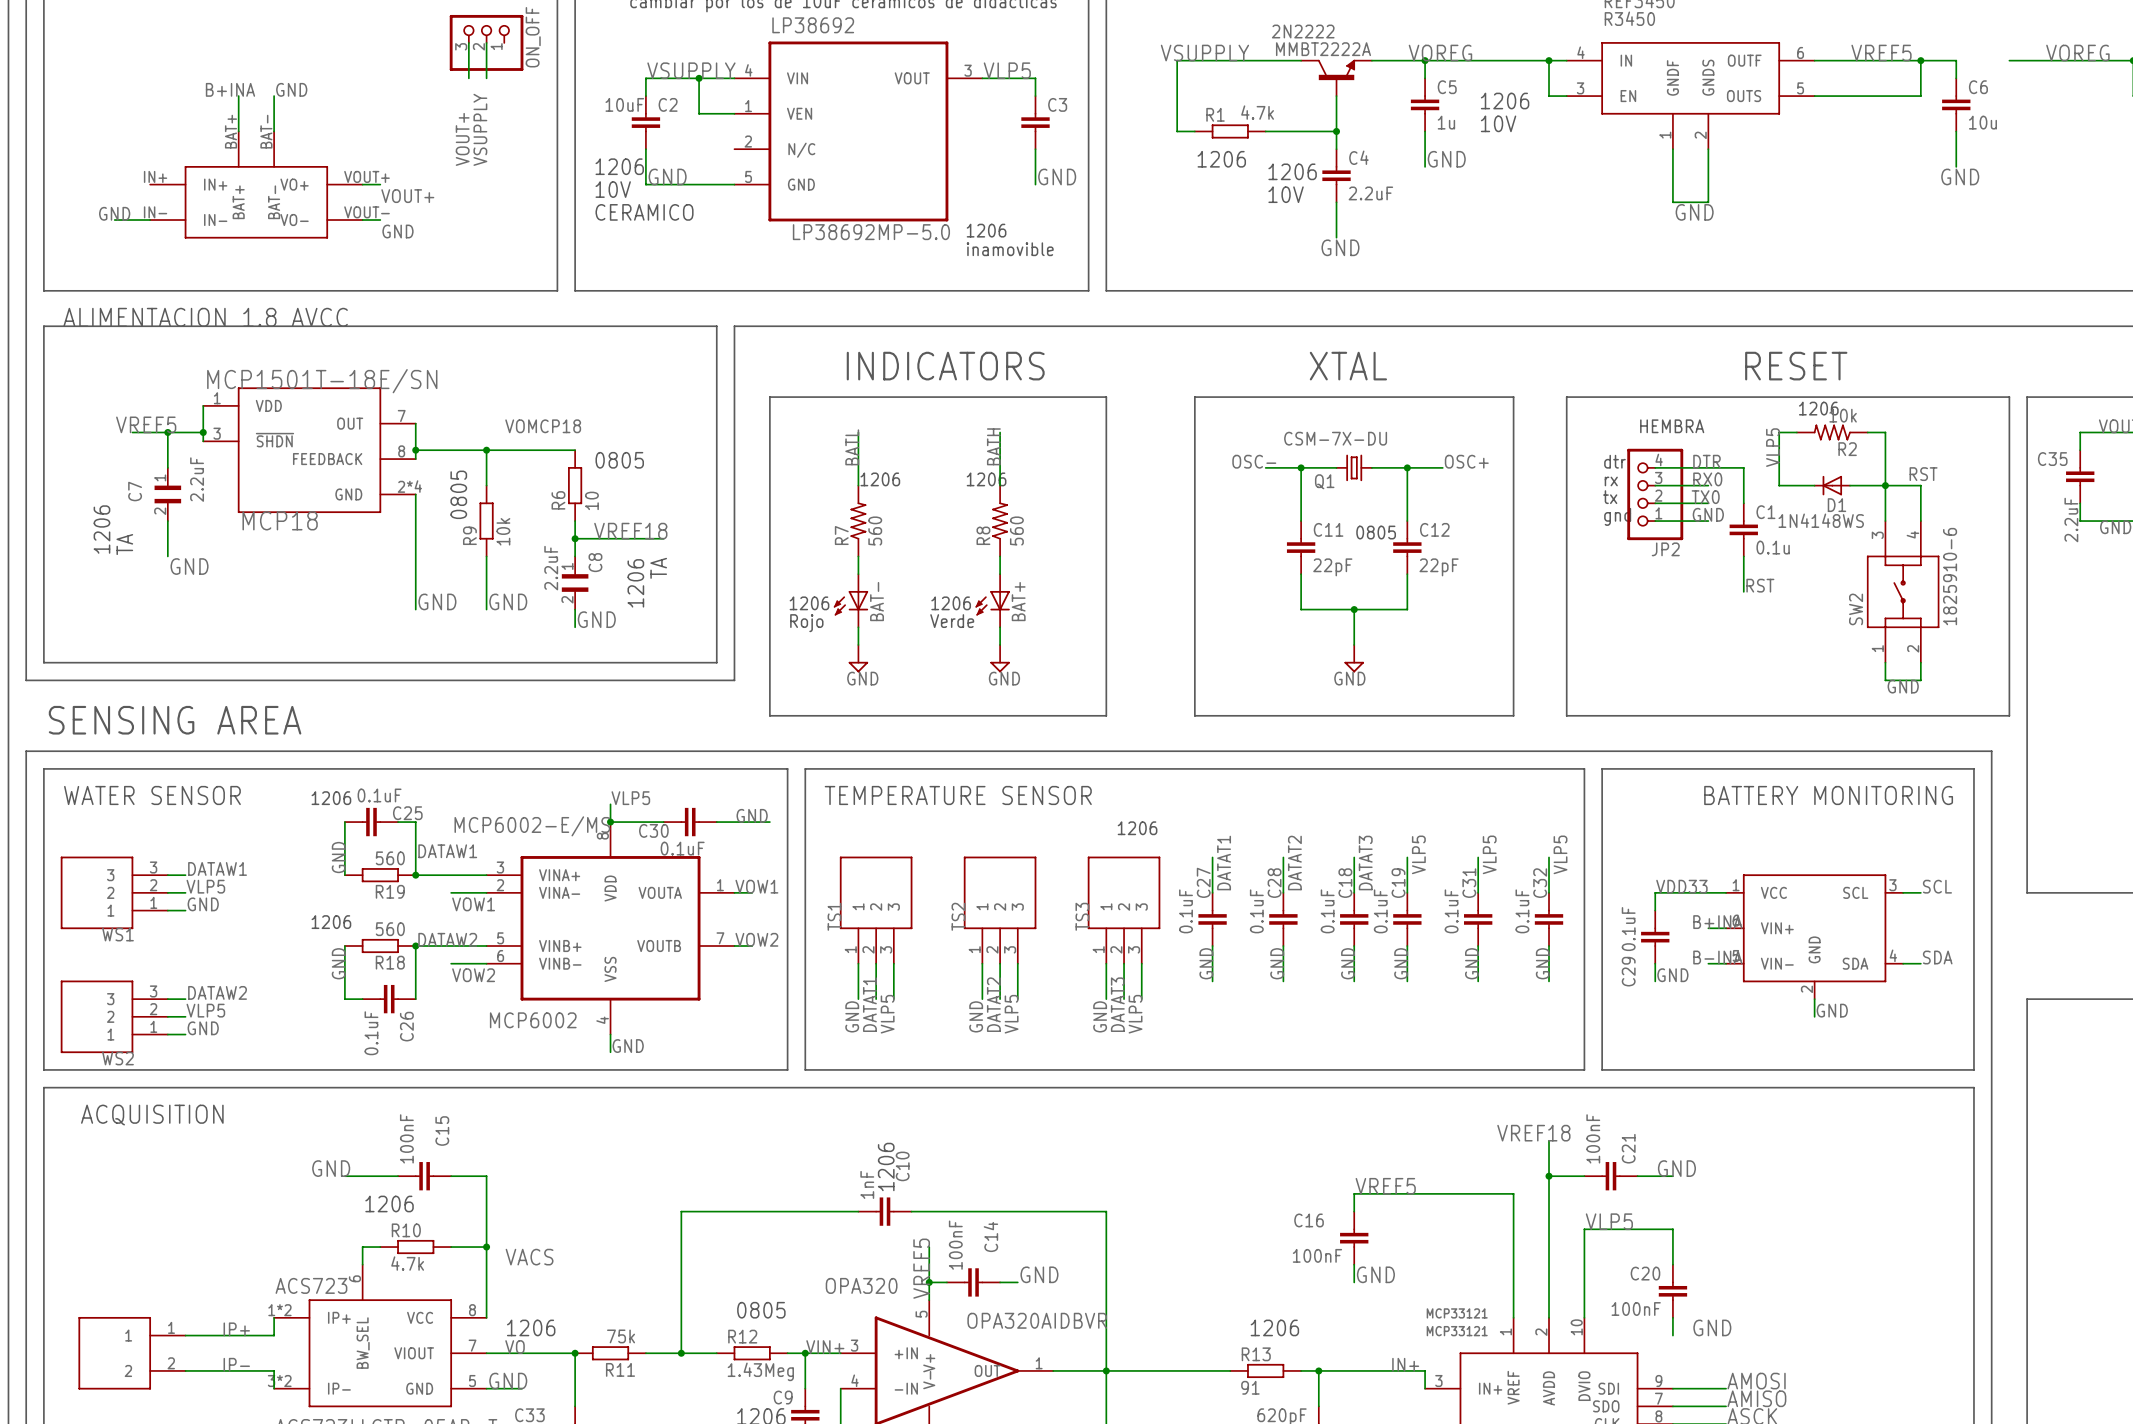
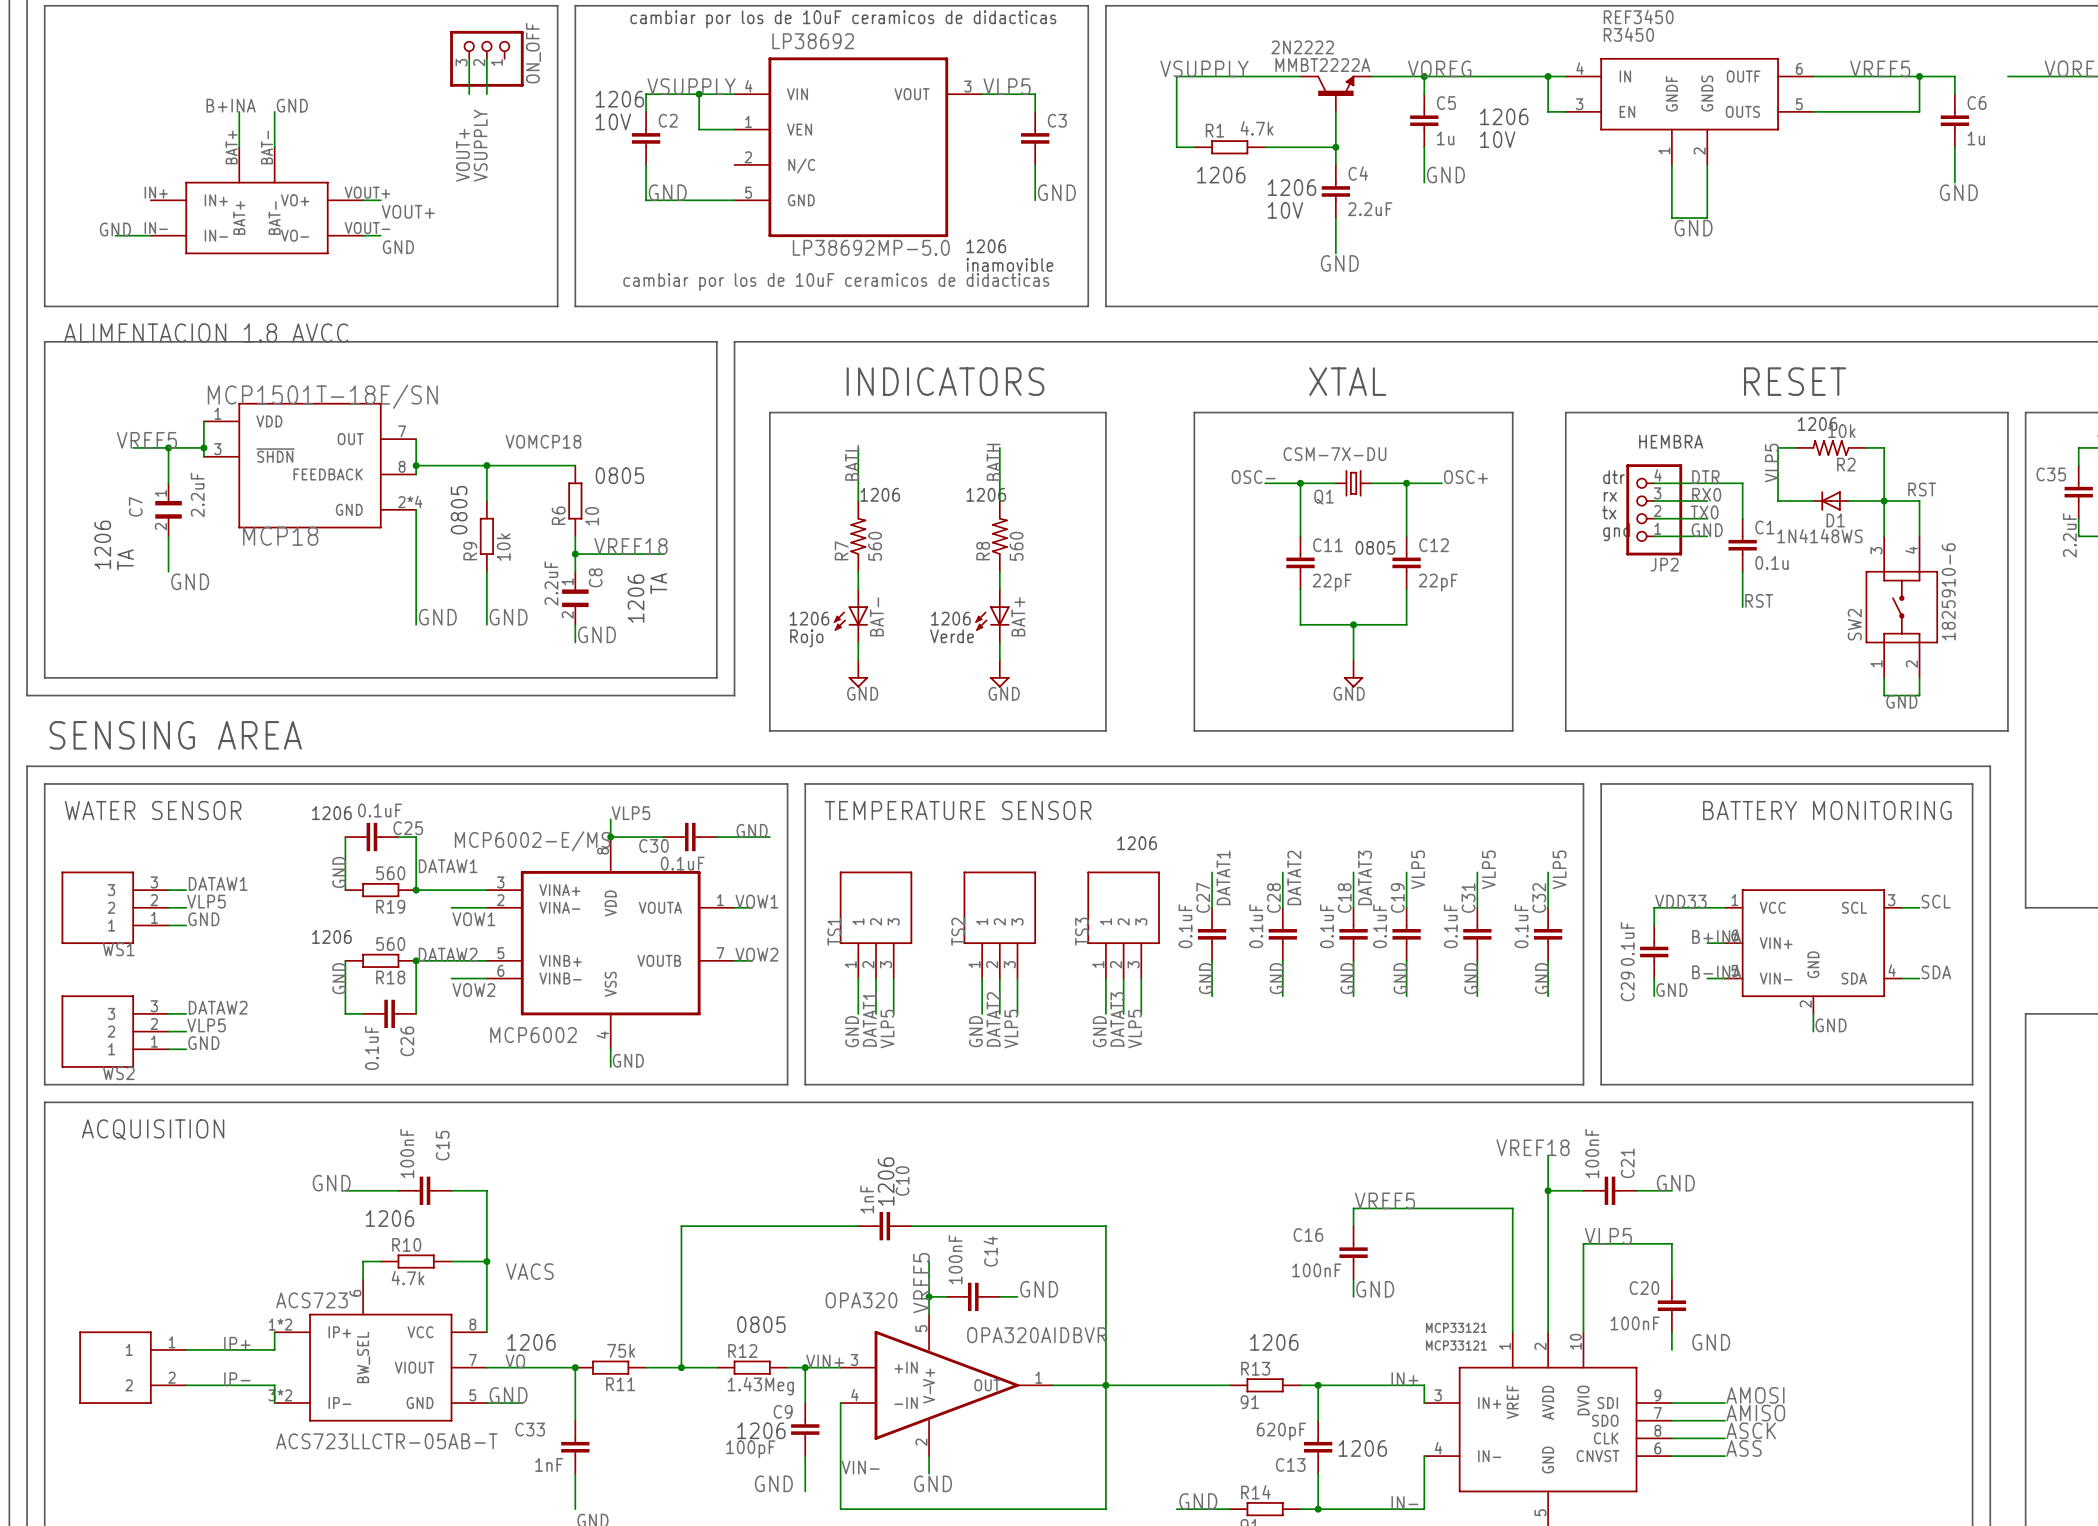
C2 value: 10uF (624, 104) -> cambiar por los de 10uF ceramicos de didacticas (836, 281)
C6 value: 10u (1982, 122) -> 1u (1976, 138)
text position: 1206 (619, 166) -> 1206 (619, 99)
text position: 10V (613, 189) -> 10V (613, 121)
text: CERAMICO (644, 212) -> none

